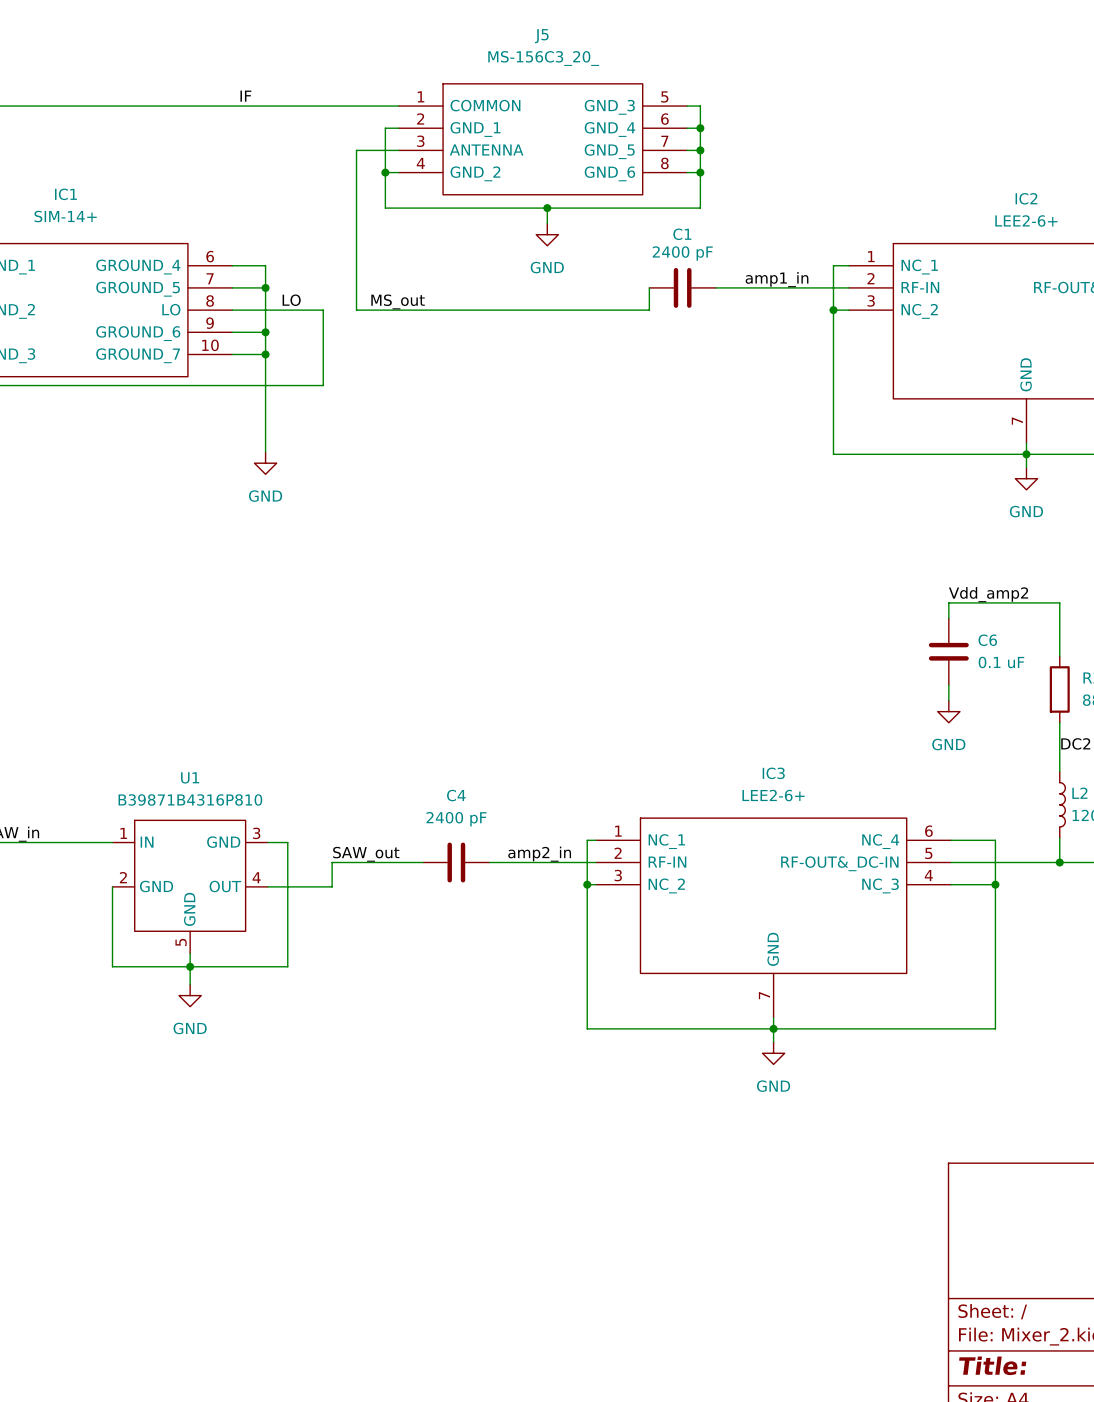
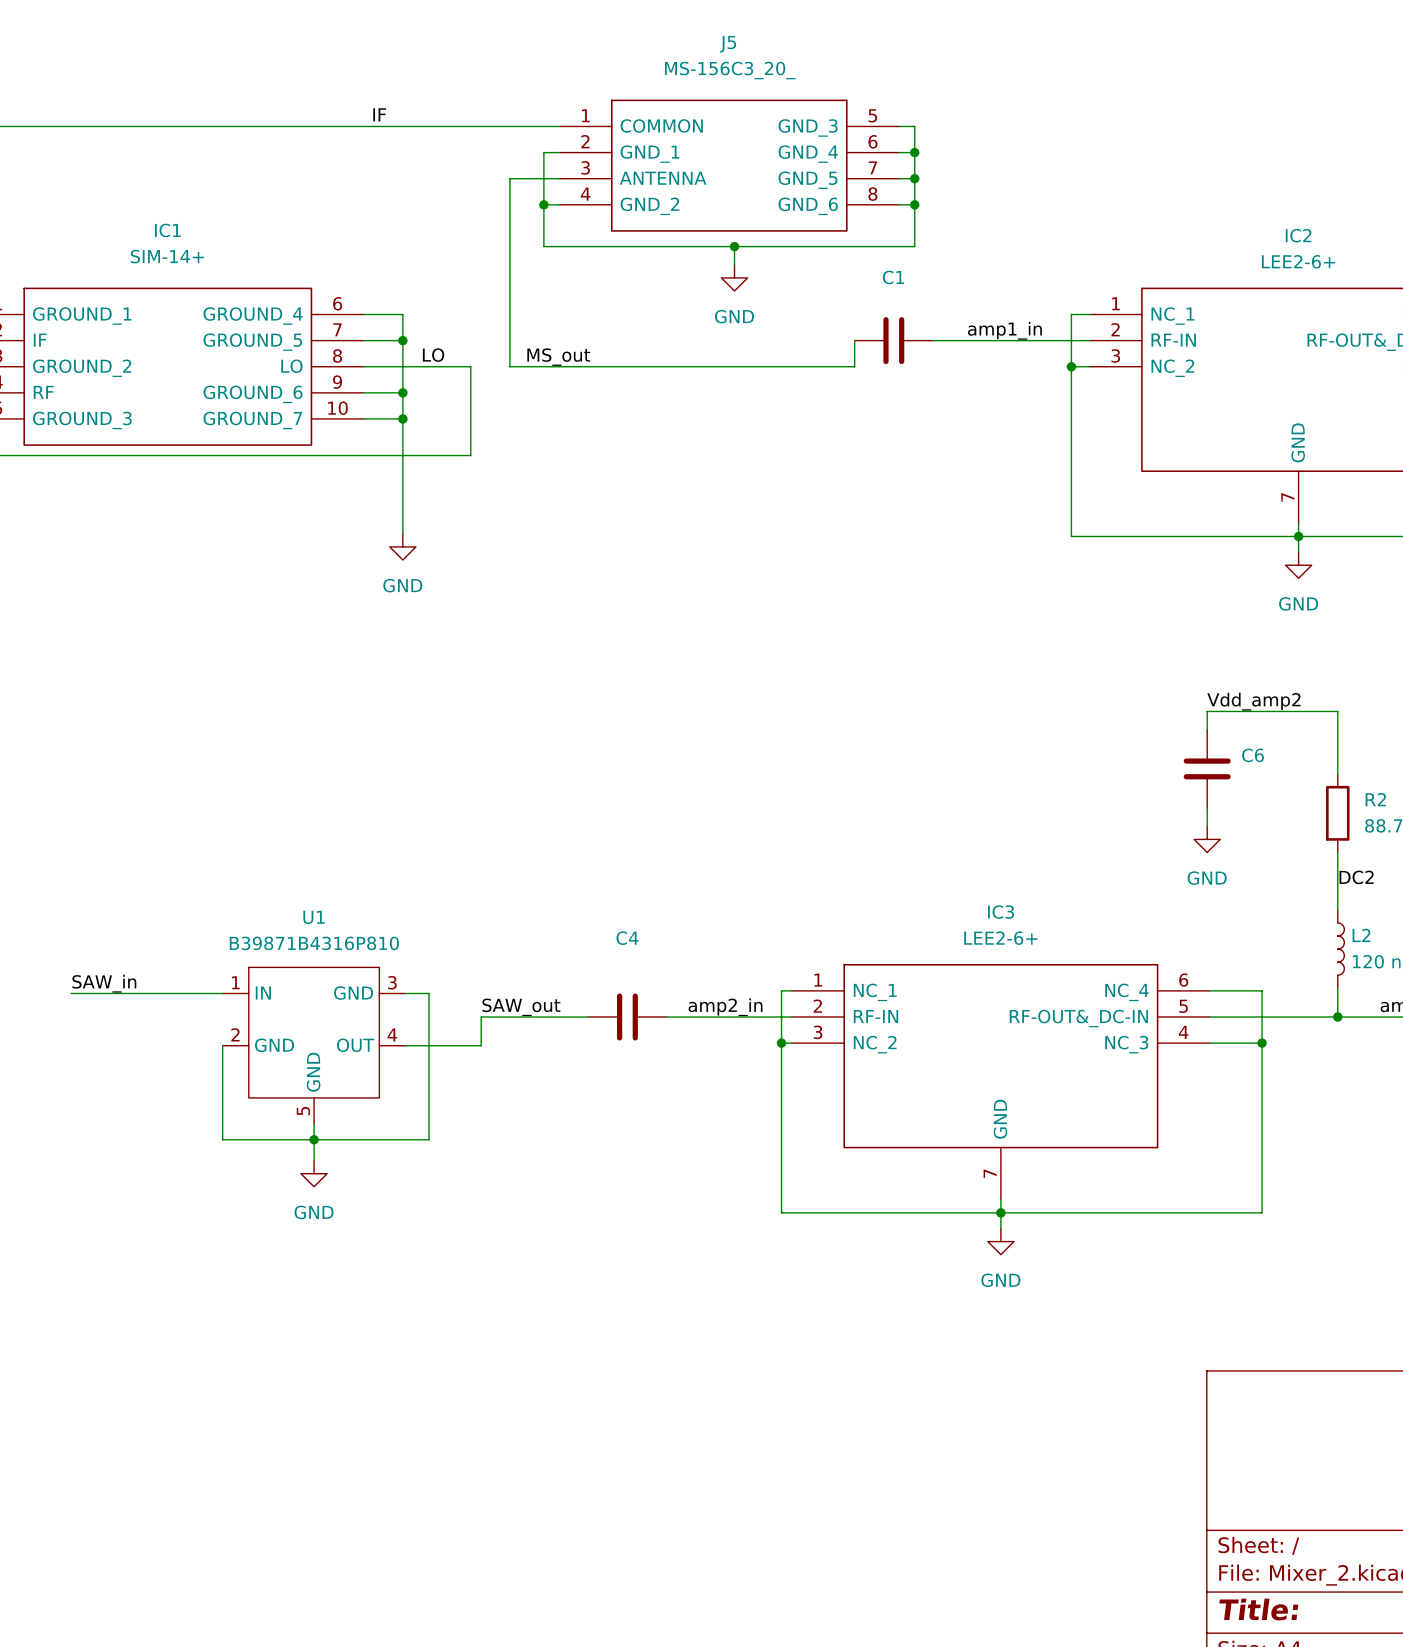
C1 value: 2400 pF (682, 253) -> none
C6 value: 0.1 uF (1001, 662) -> none
C4 value: 2400 pF (456, 819) -> none

